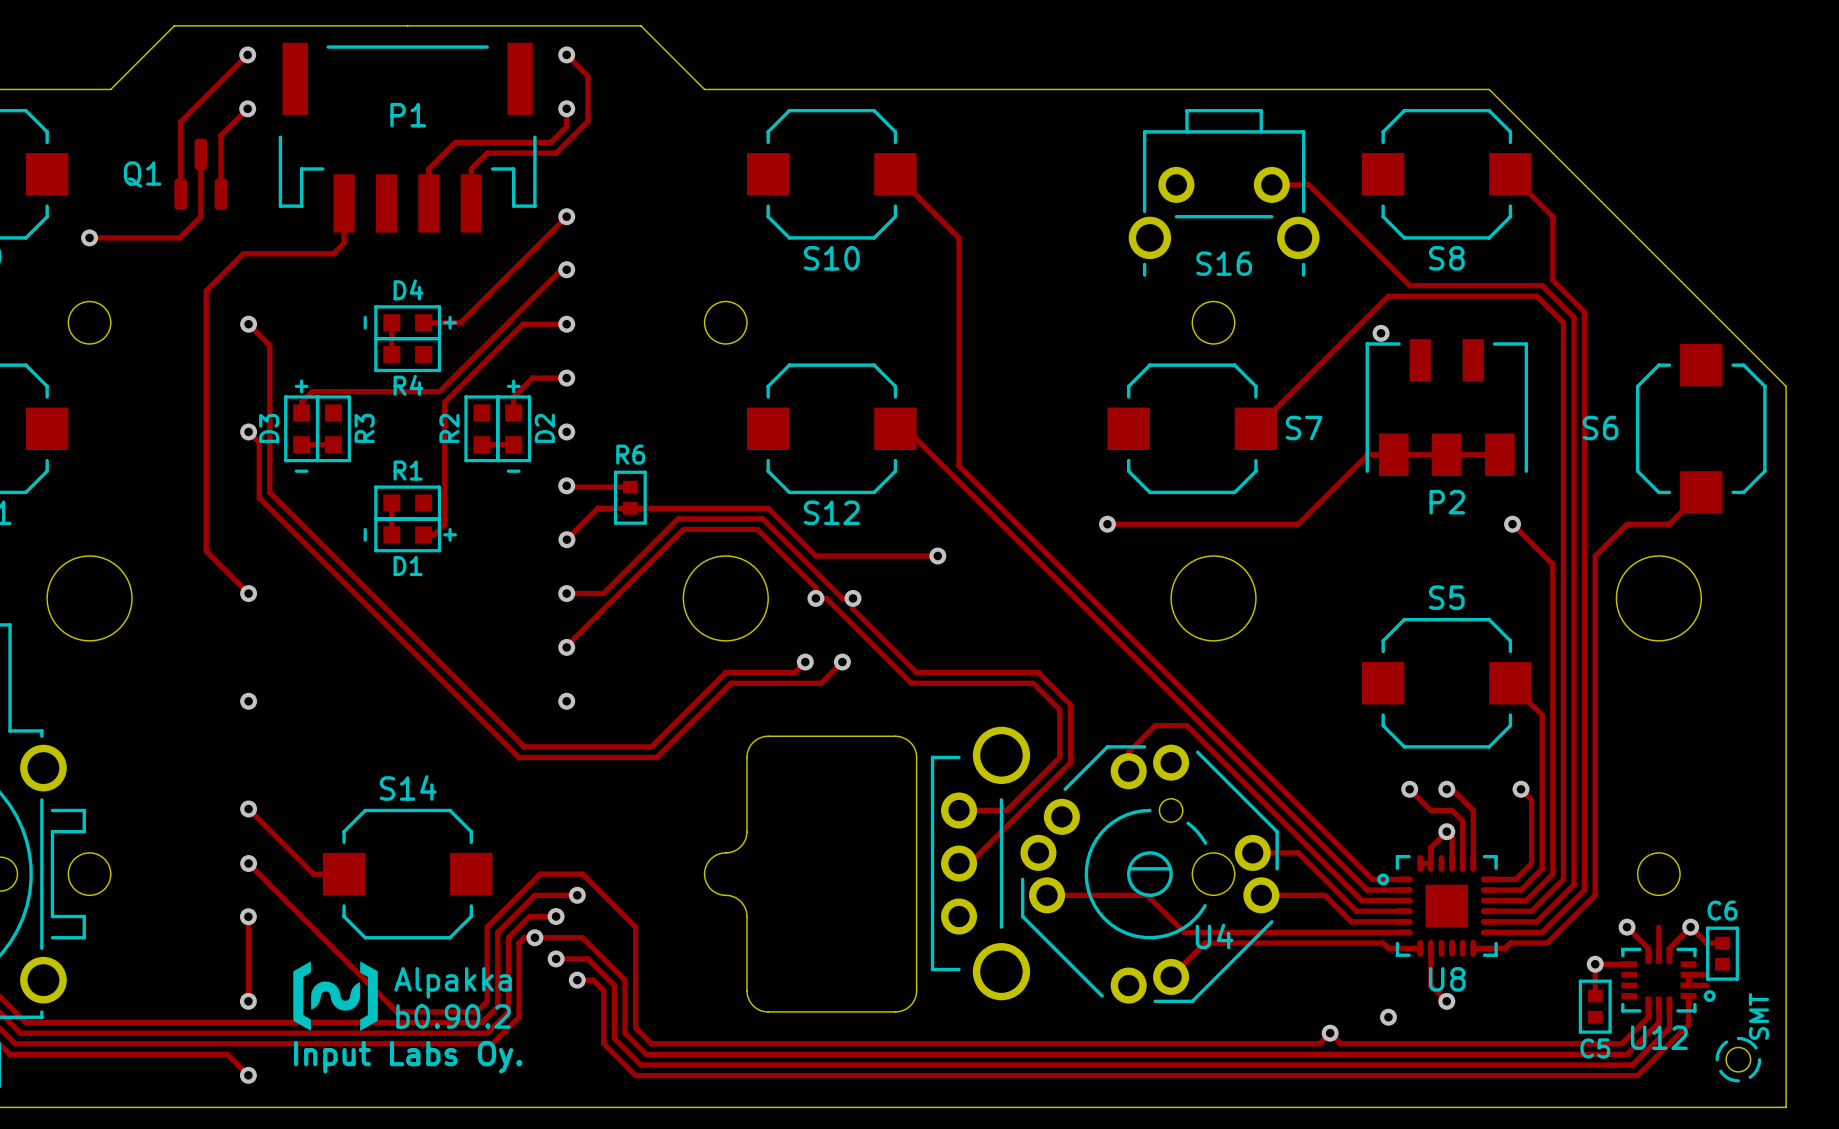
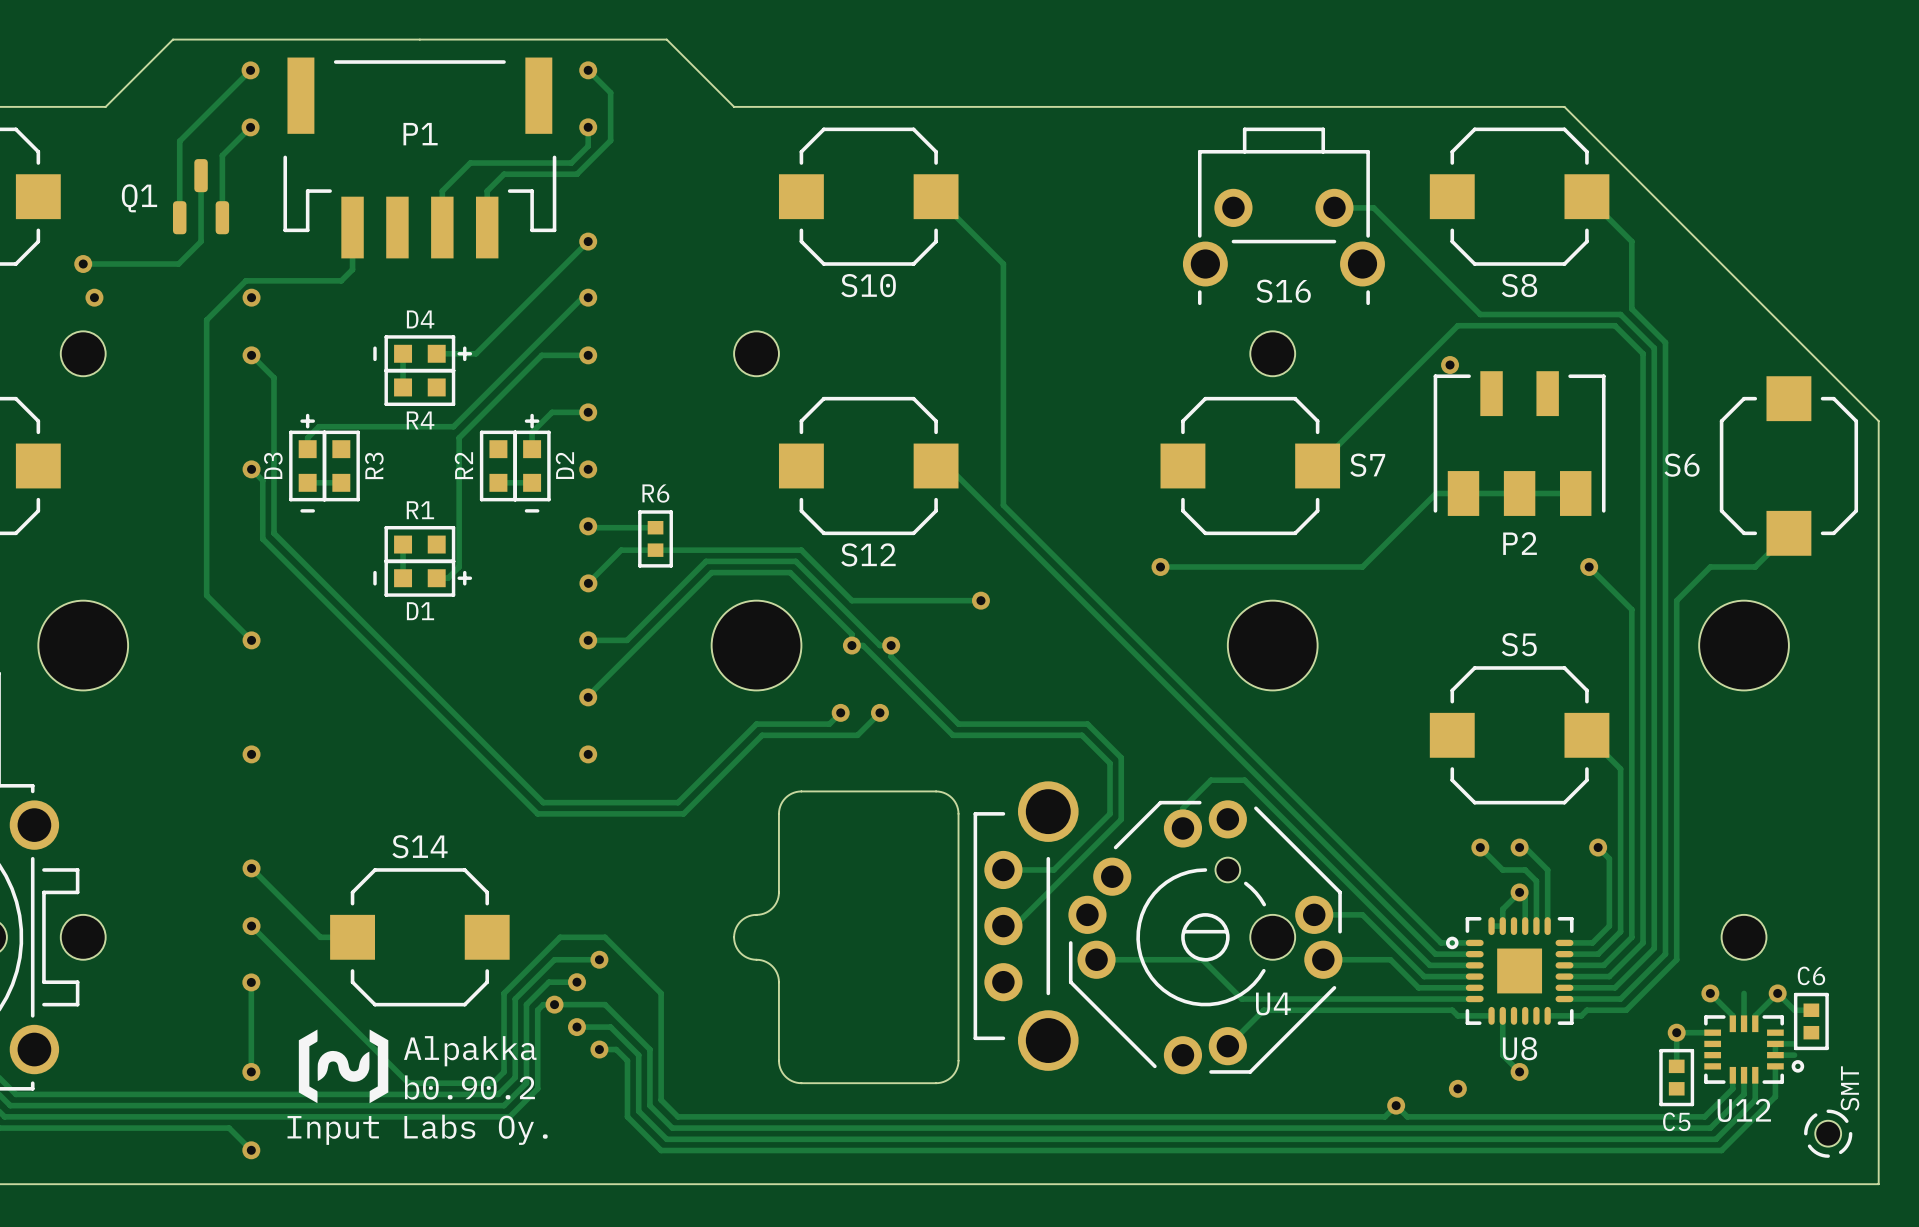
via: none -> (94, 297)
via: none -> (251, 297)

